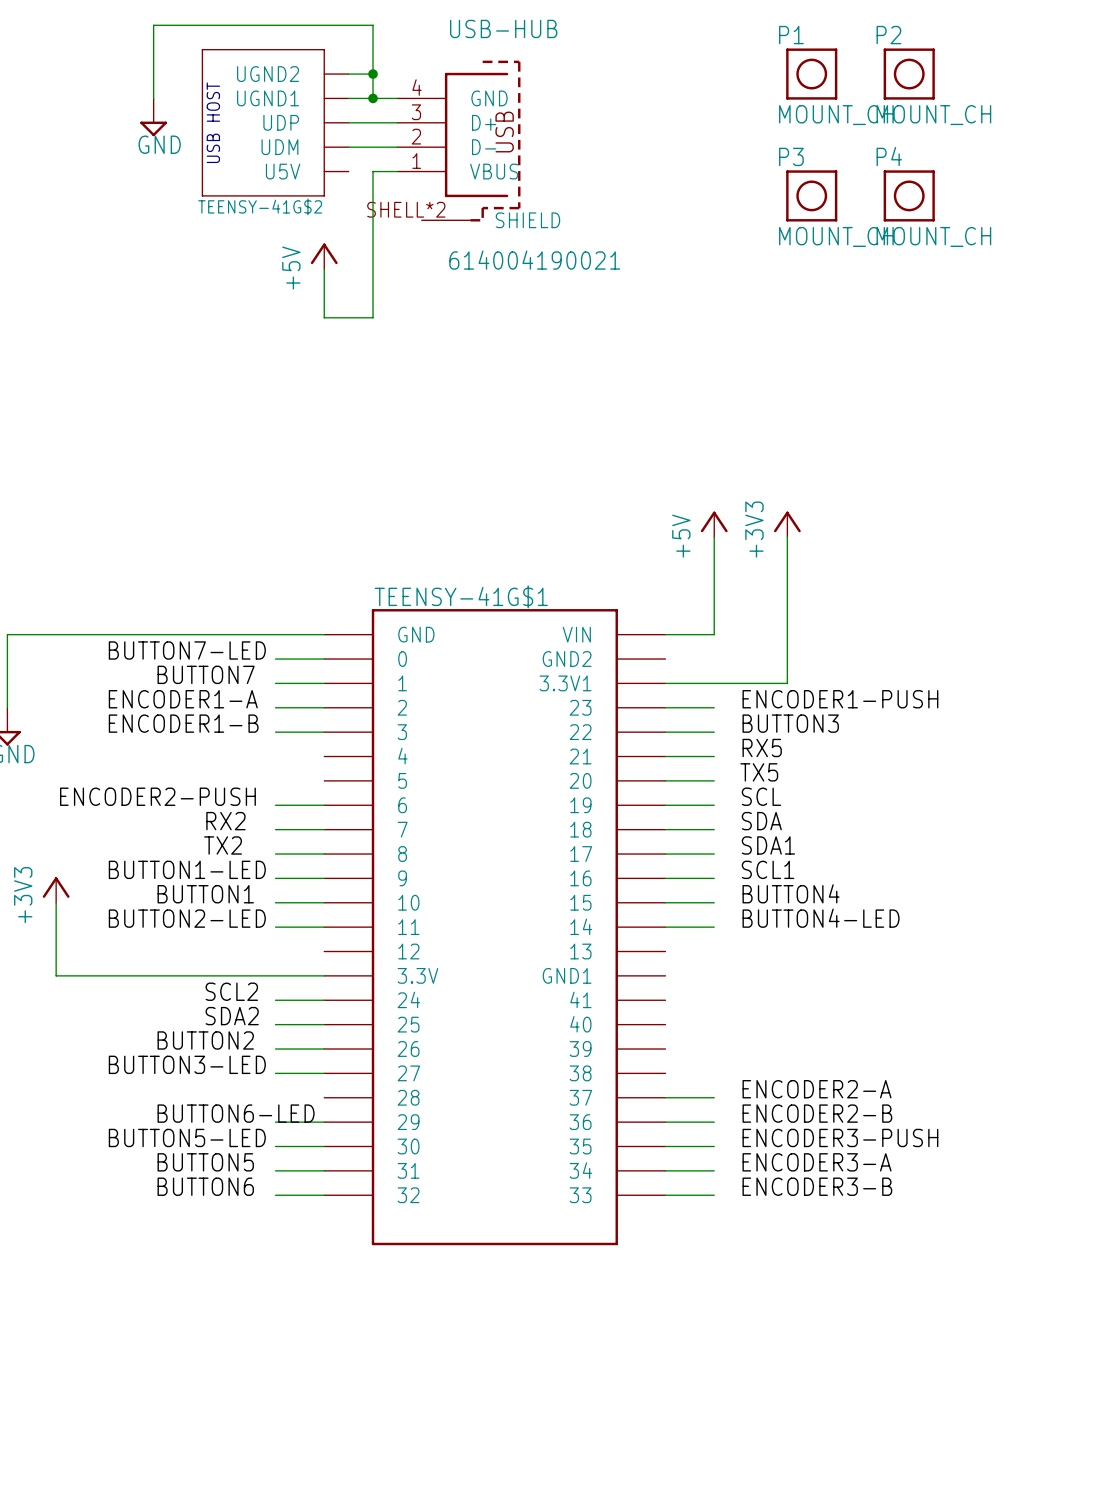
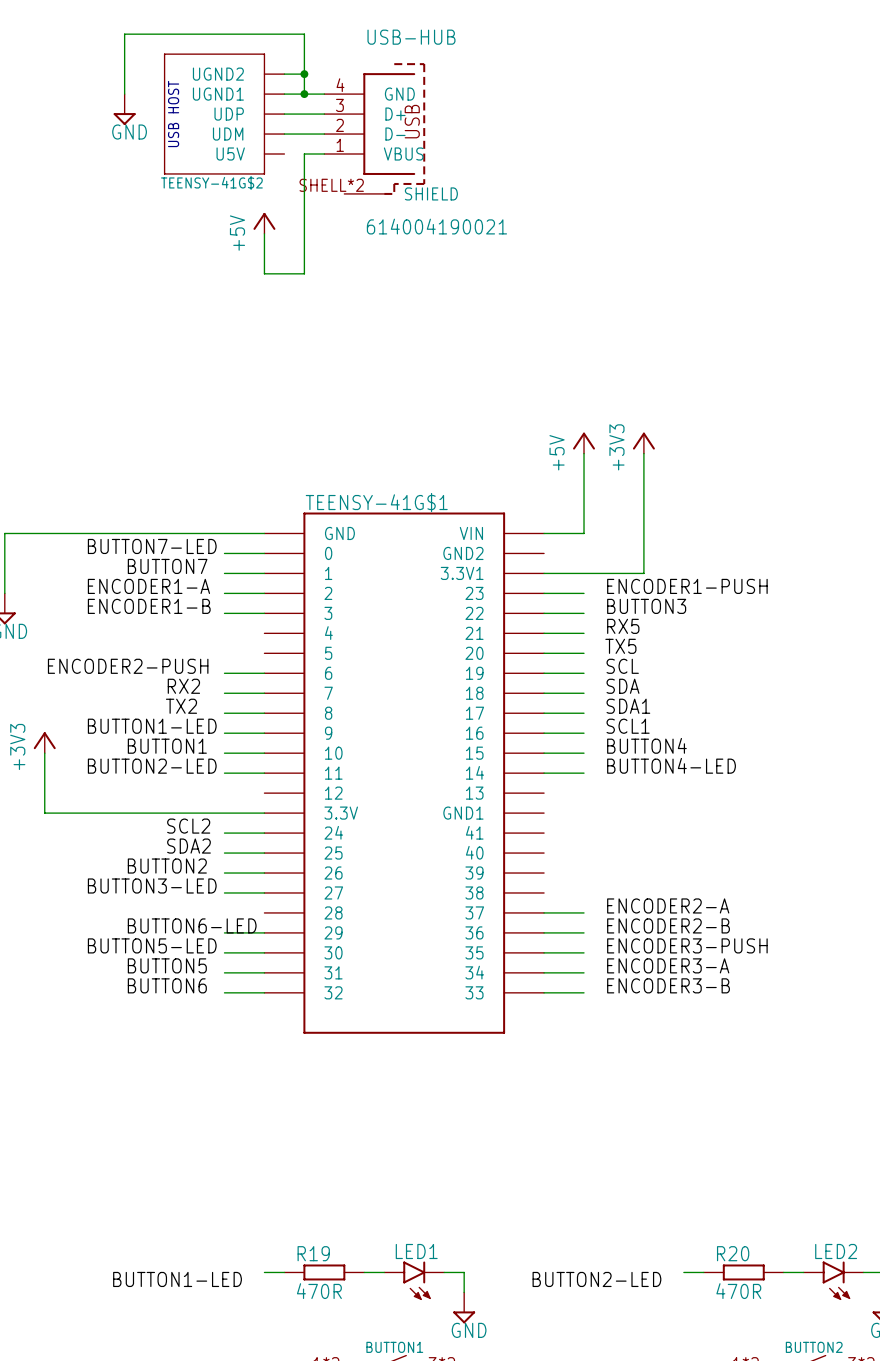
P1: MOUNT_CH (811, 74) -> none
P2: MOUNT_CH (909, 74) -> none
P3: MOUNT_CH (811, 195) -> none
P4: MOUNT_CH (909, 195) -> none

